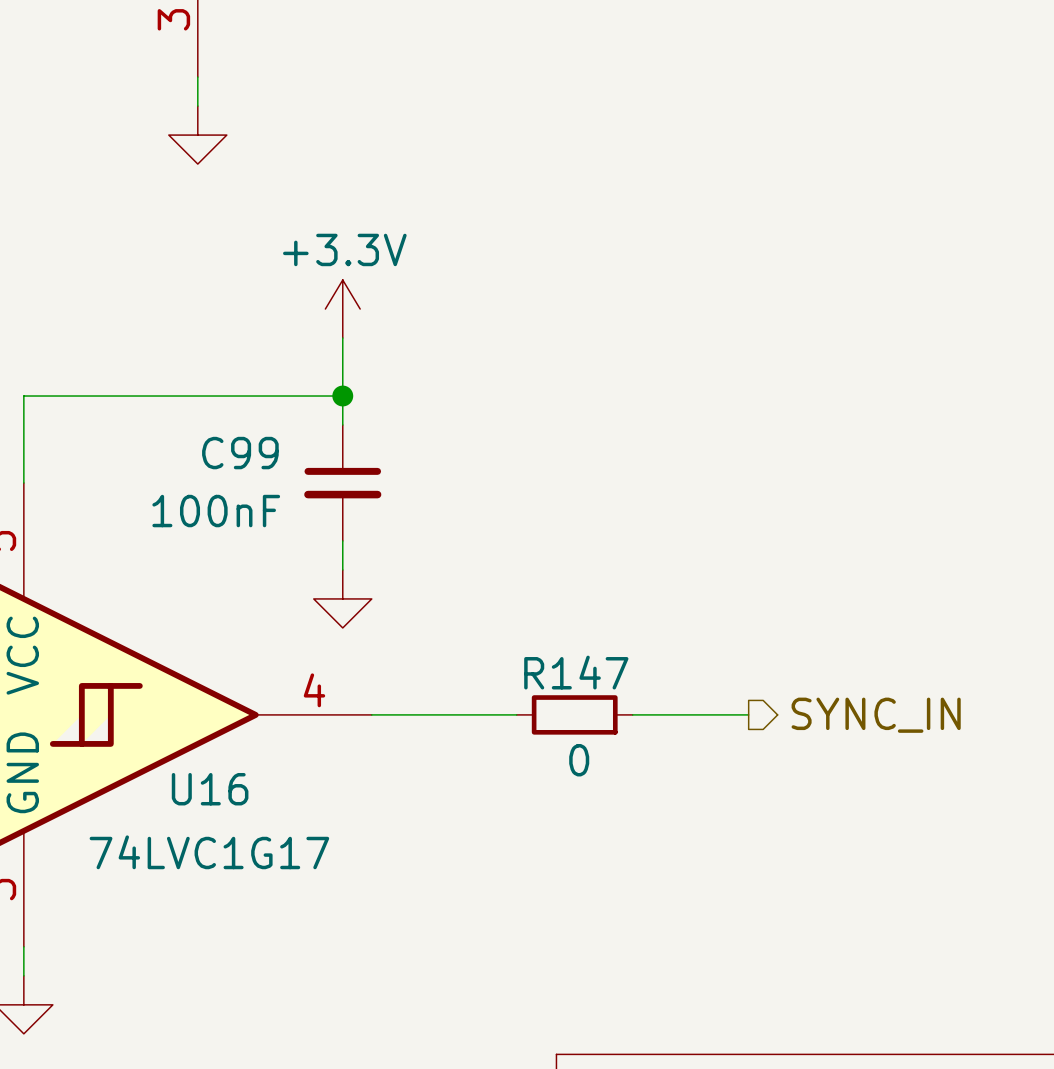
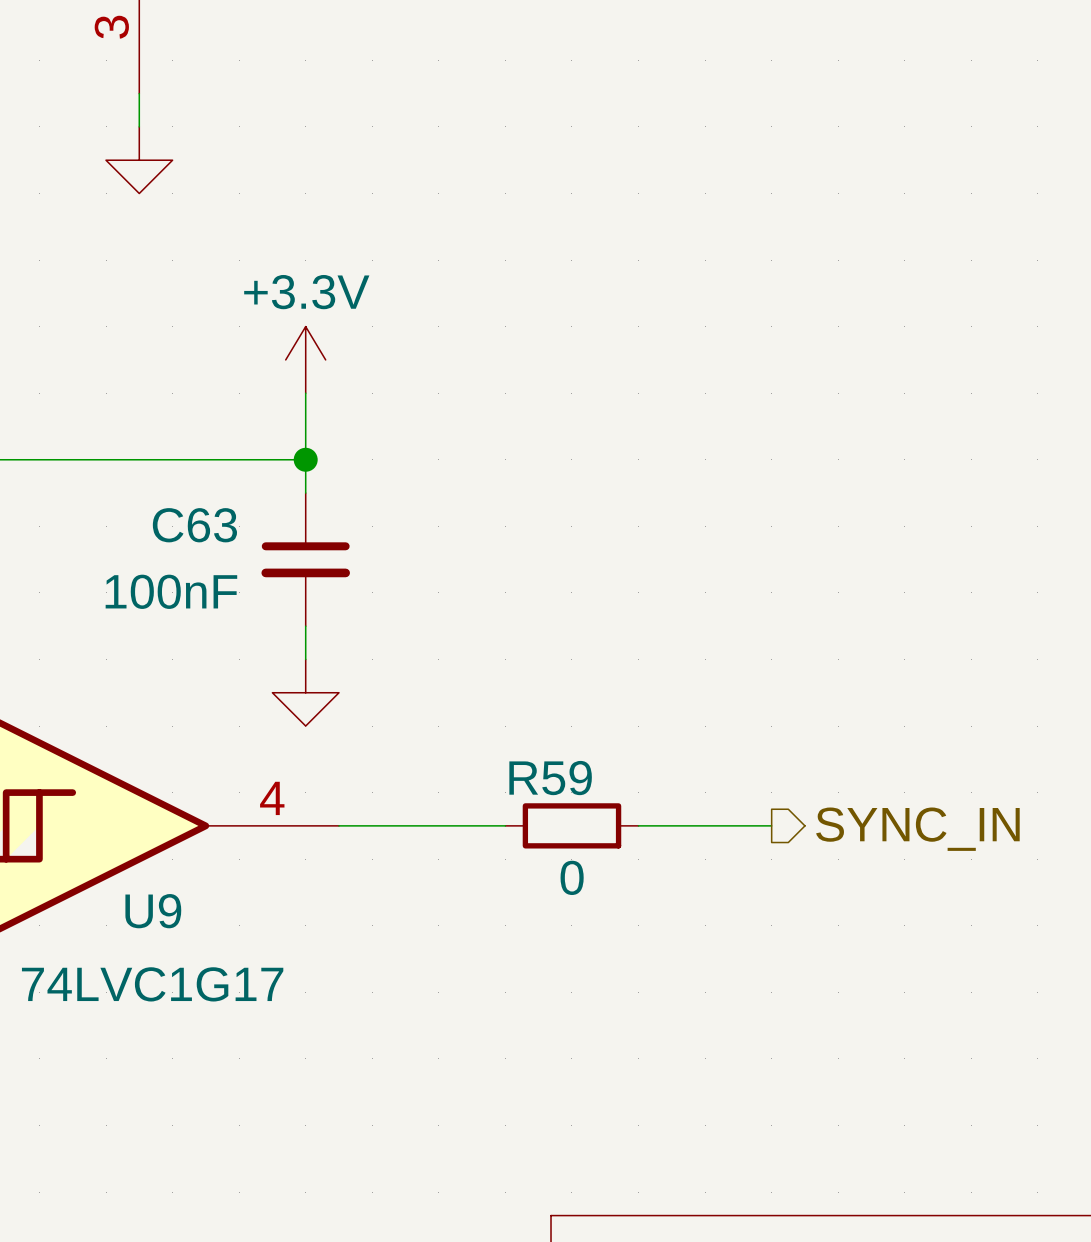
C99 name: C99 (240, 453) -> C63 (194, 525)
R147 name: R147 (576, 672) -> R59 (550, 778)
U16 name: U16 (210, 789) -> U9 (153, 911)

